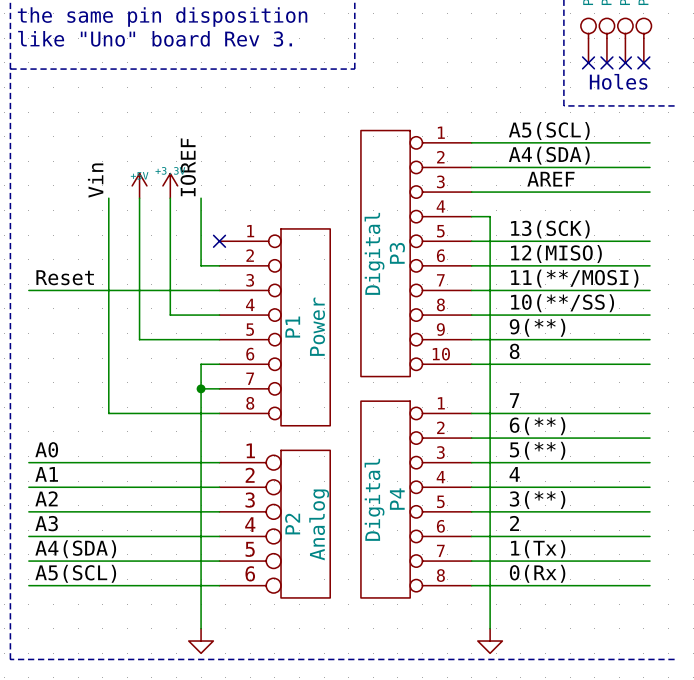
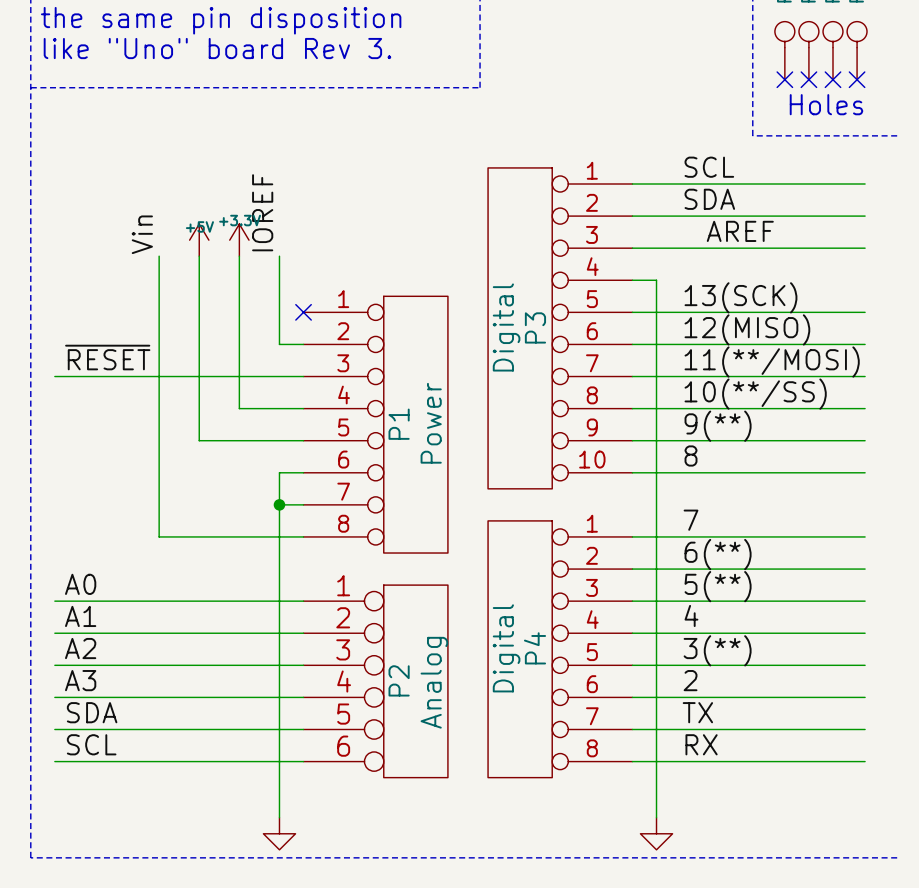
label: A5(SCL) (549, 131) -> SCL (709, 167)
label: A4(SDA) (549, 155) -> SDA (709, 199)
label: Reset (65, 277) -> ~{RESET} (107, 357)
label: A4(SDA) (75, 549) -> SDA (92, 712)
label: 1(Tx) (538, 549) -> TX (697, 712)
label: A5(SCL) (75, 573) -> SCL (91, 744)
label: 0(Rx) (537, 573) -> RX (701, 744)

